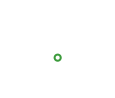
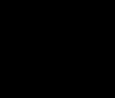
via: (57, 57) -> none

